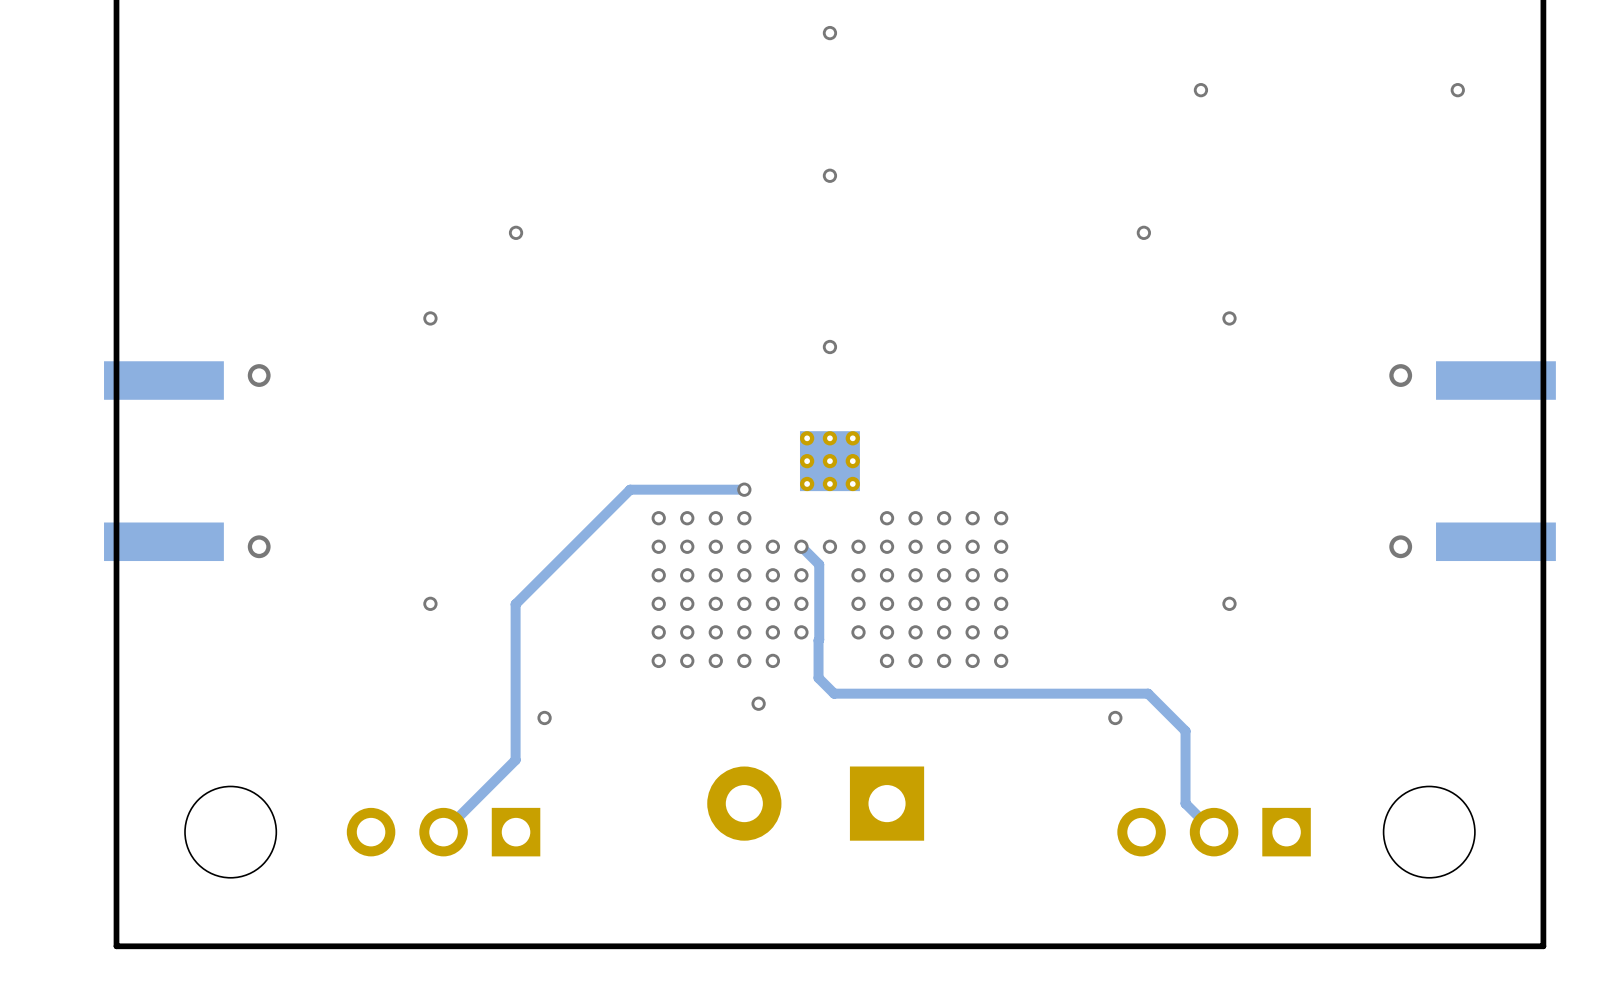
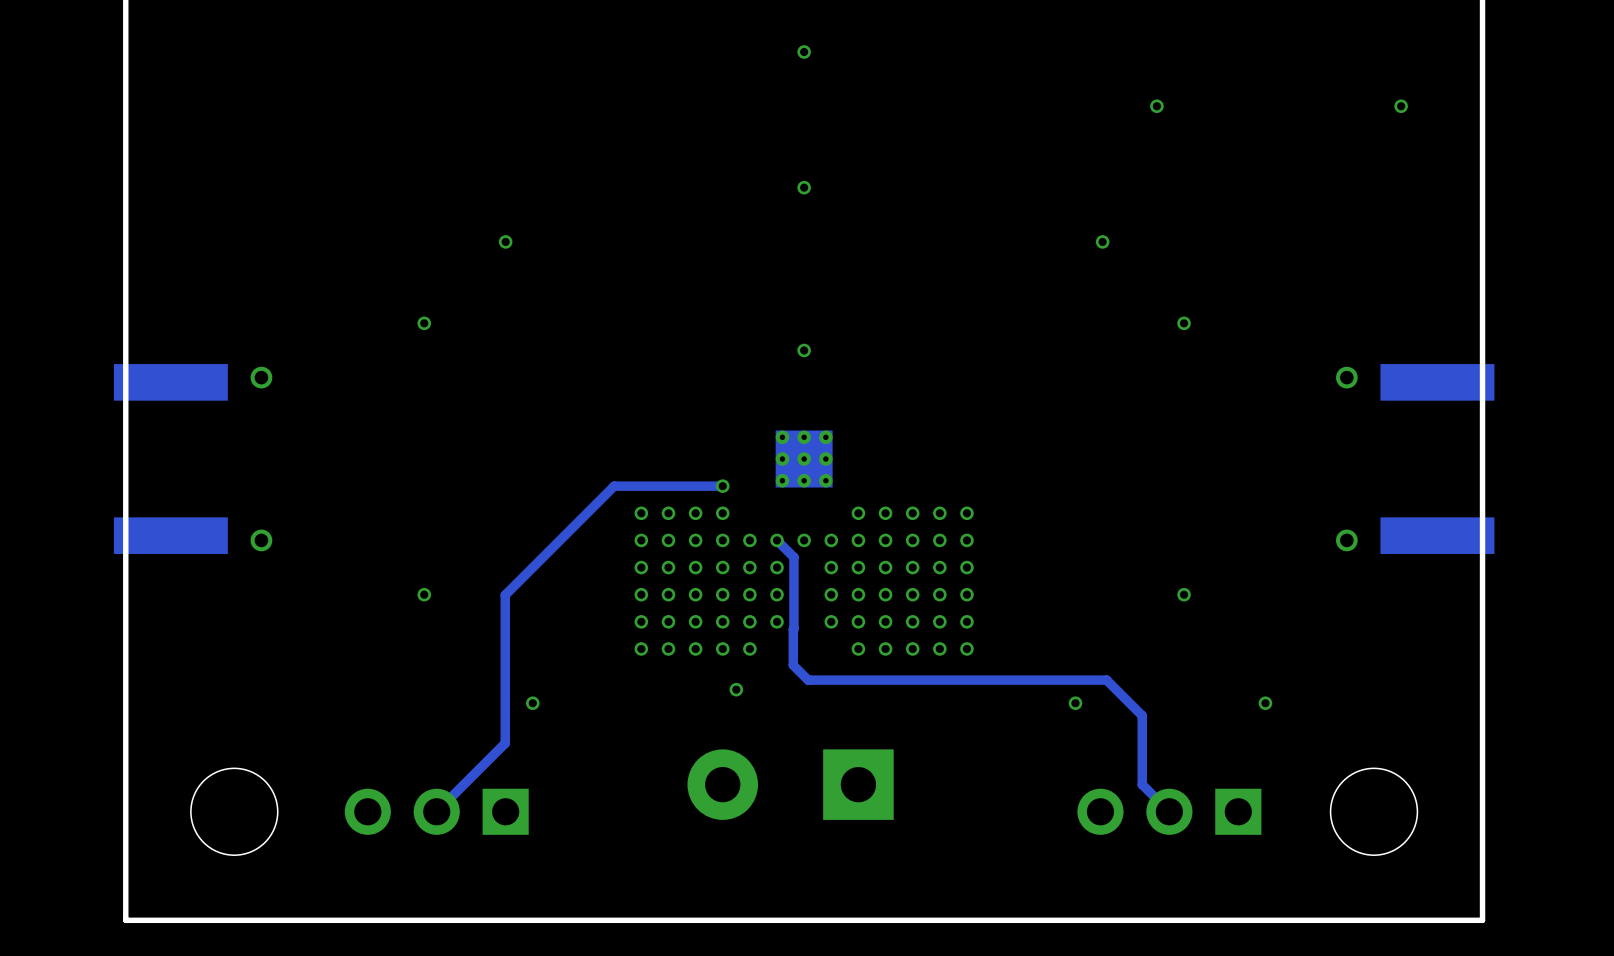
via: none -> (1265, 703)

